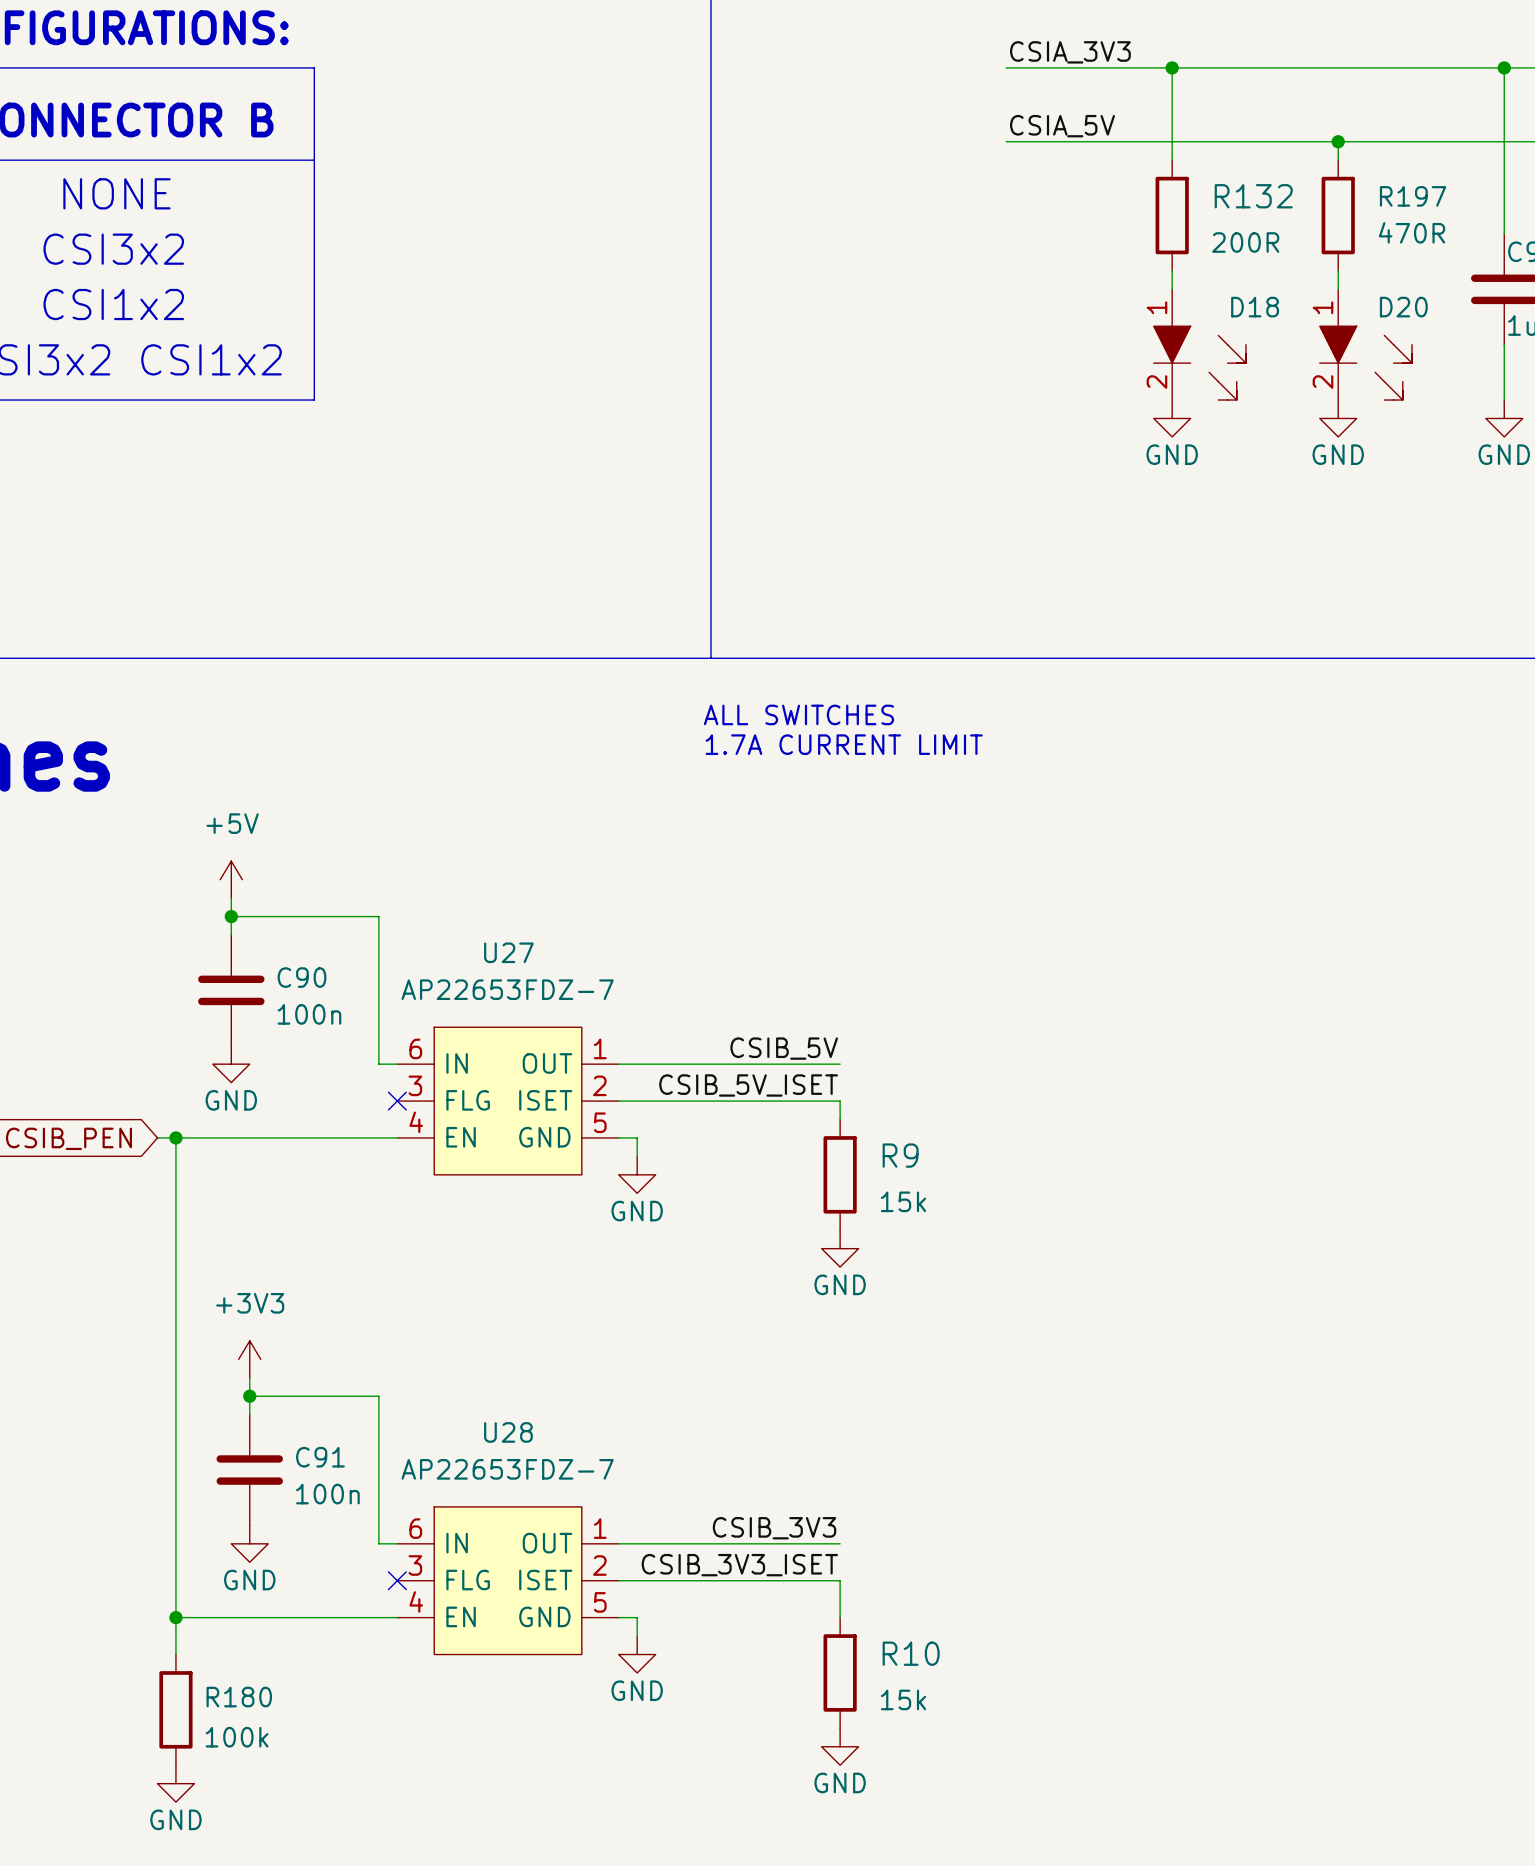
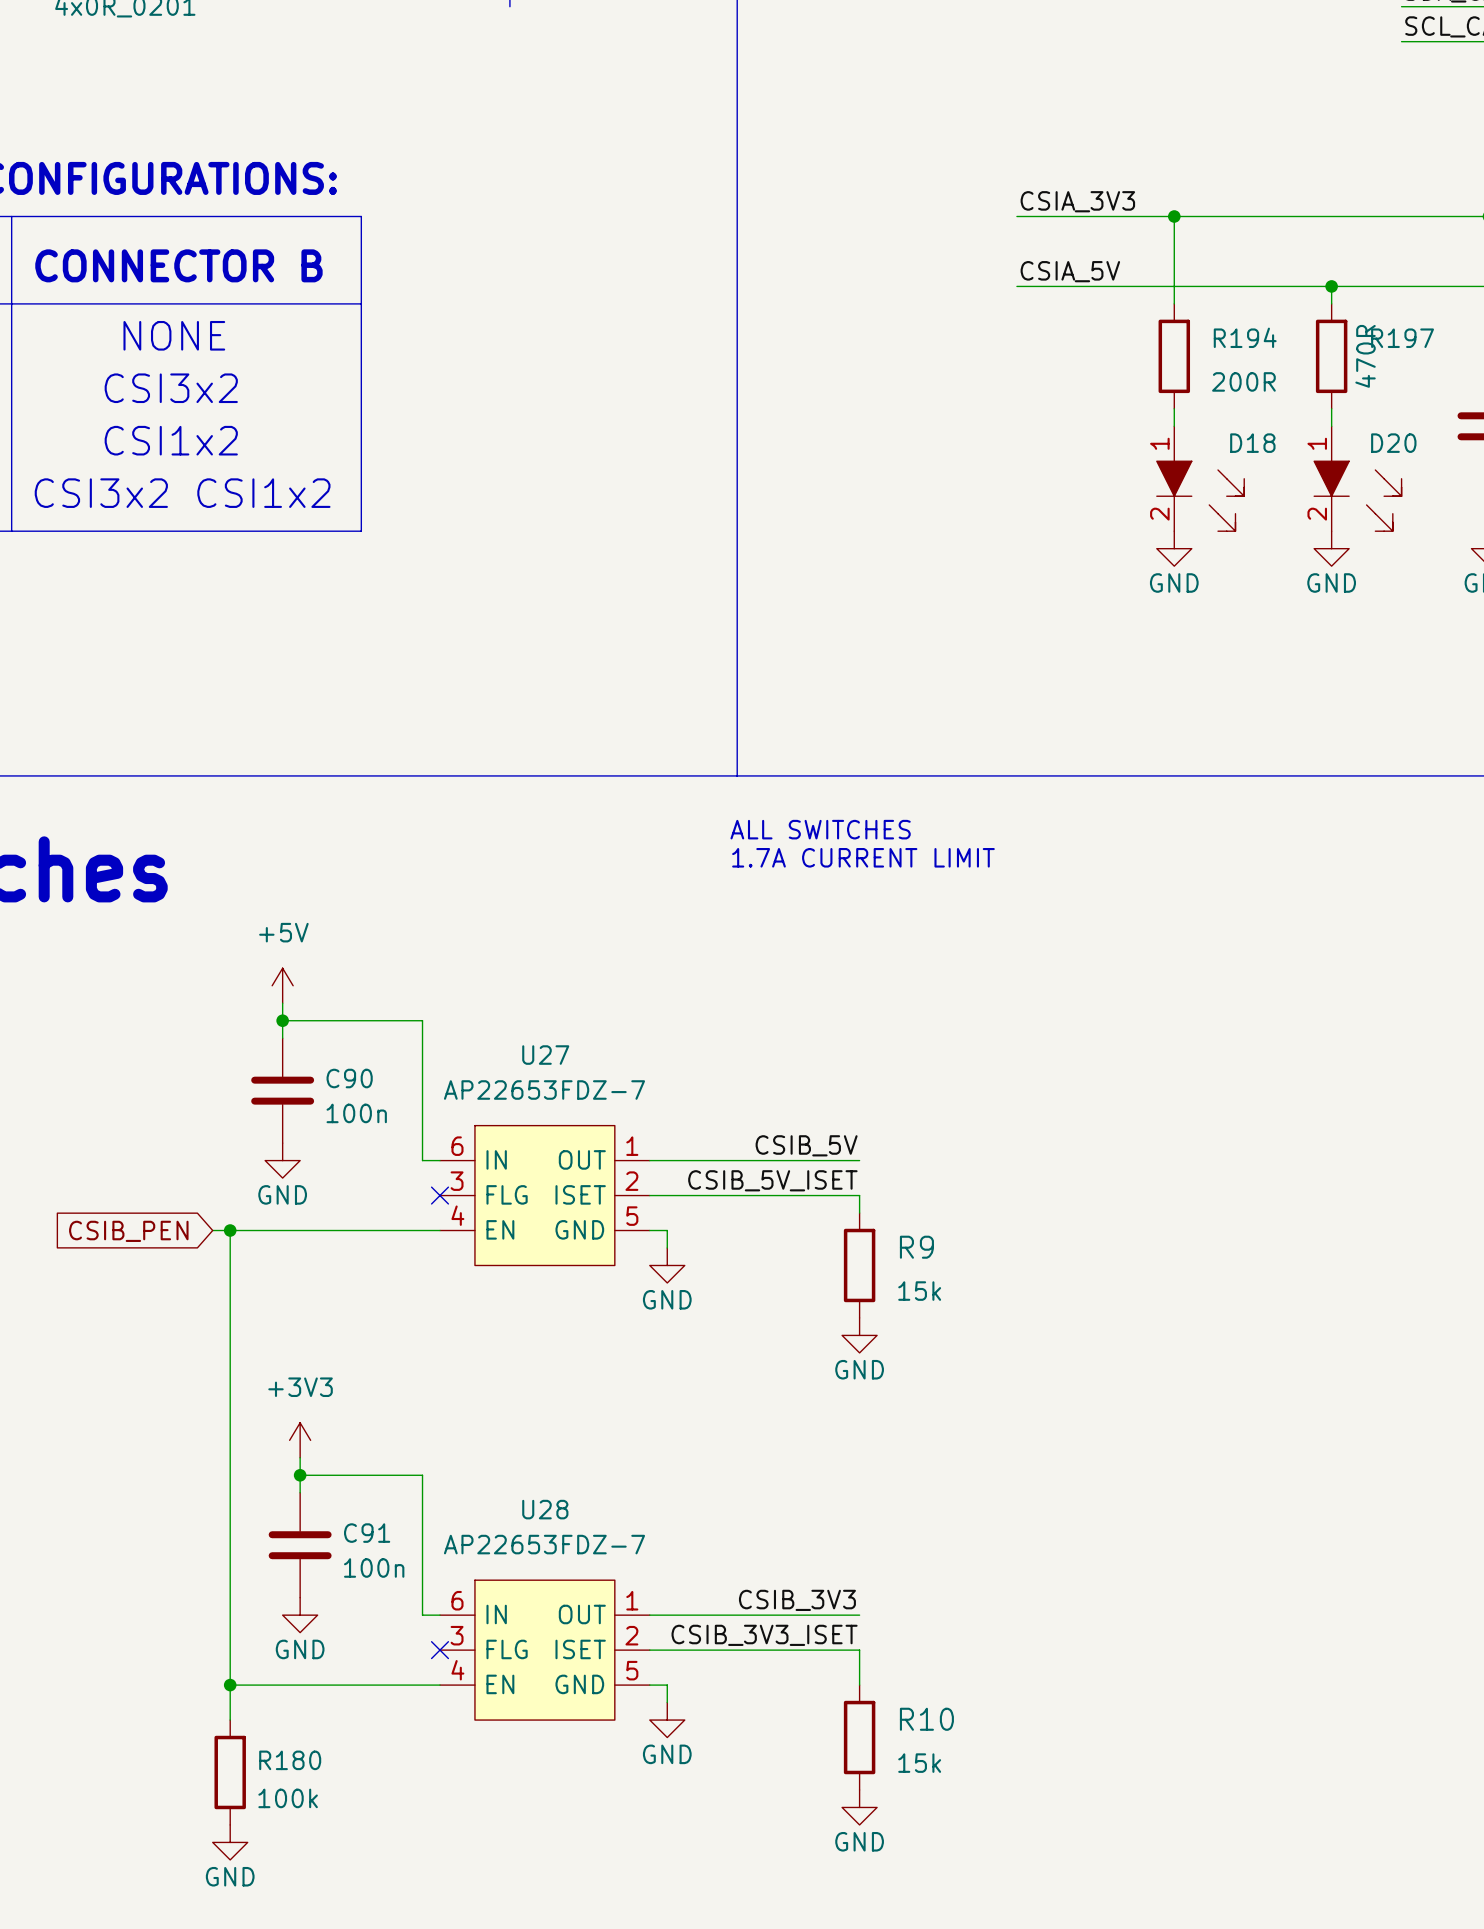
R132 name: R132 (1253, 196) -> R194 (1245, 337)
R197 text rotation: 0° (1412, 232) -> 90° counterclockwise (1365, 356)

